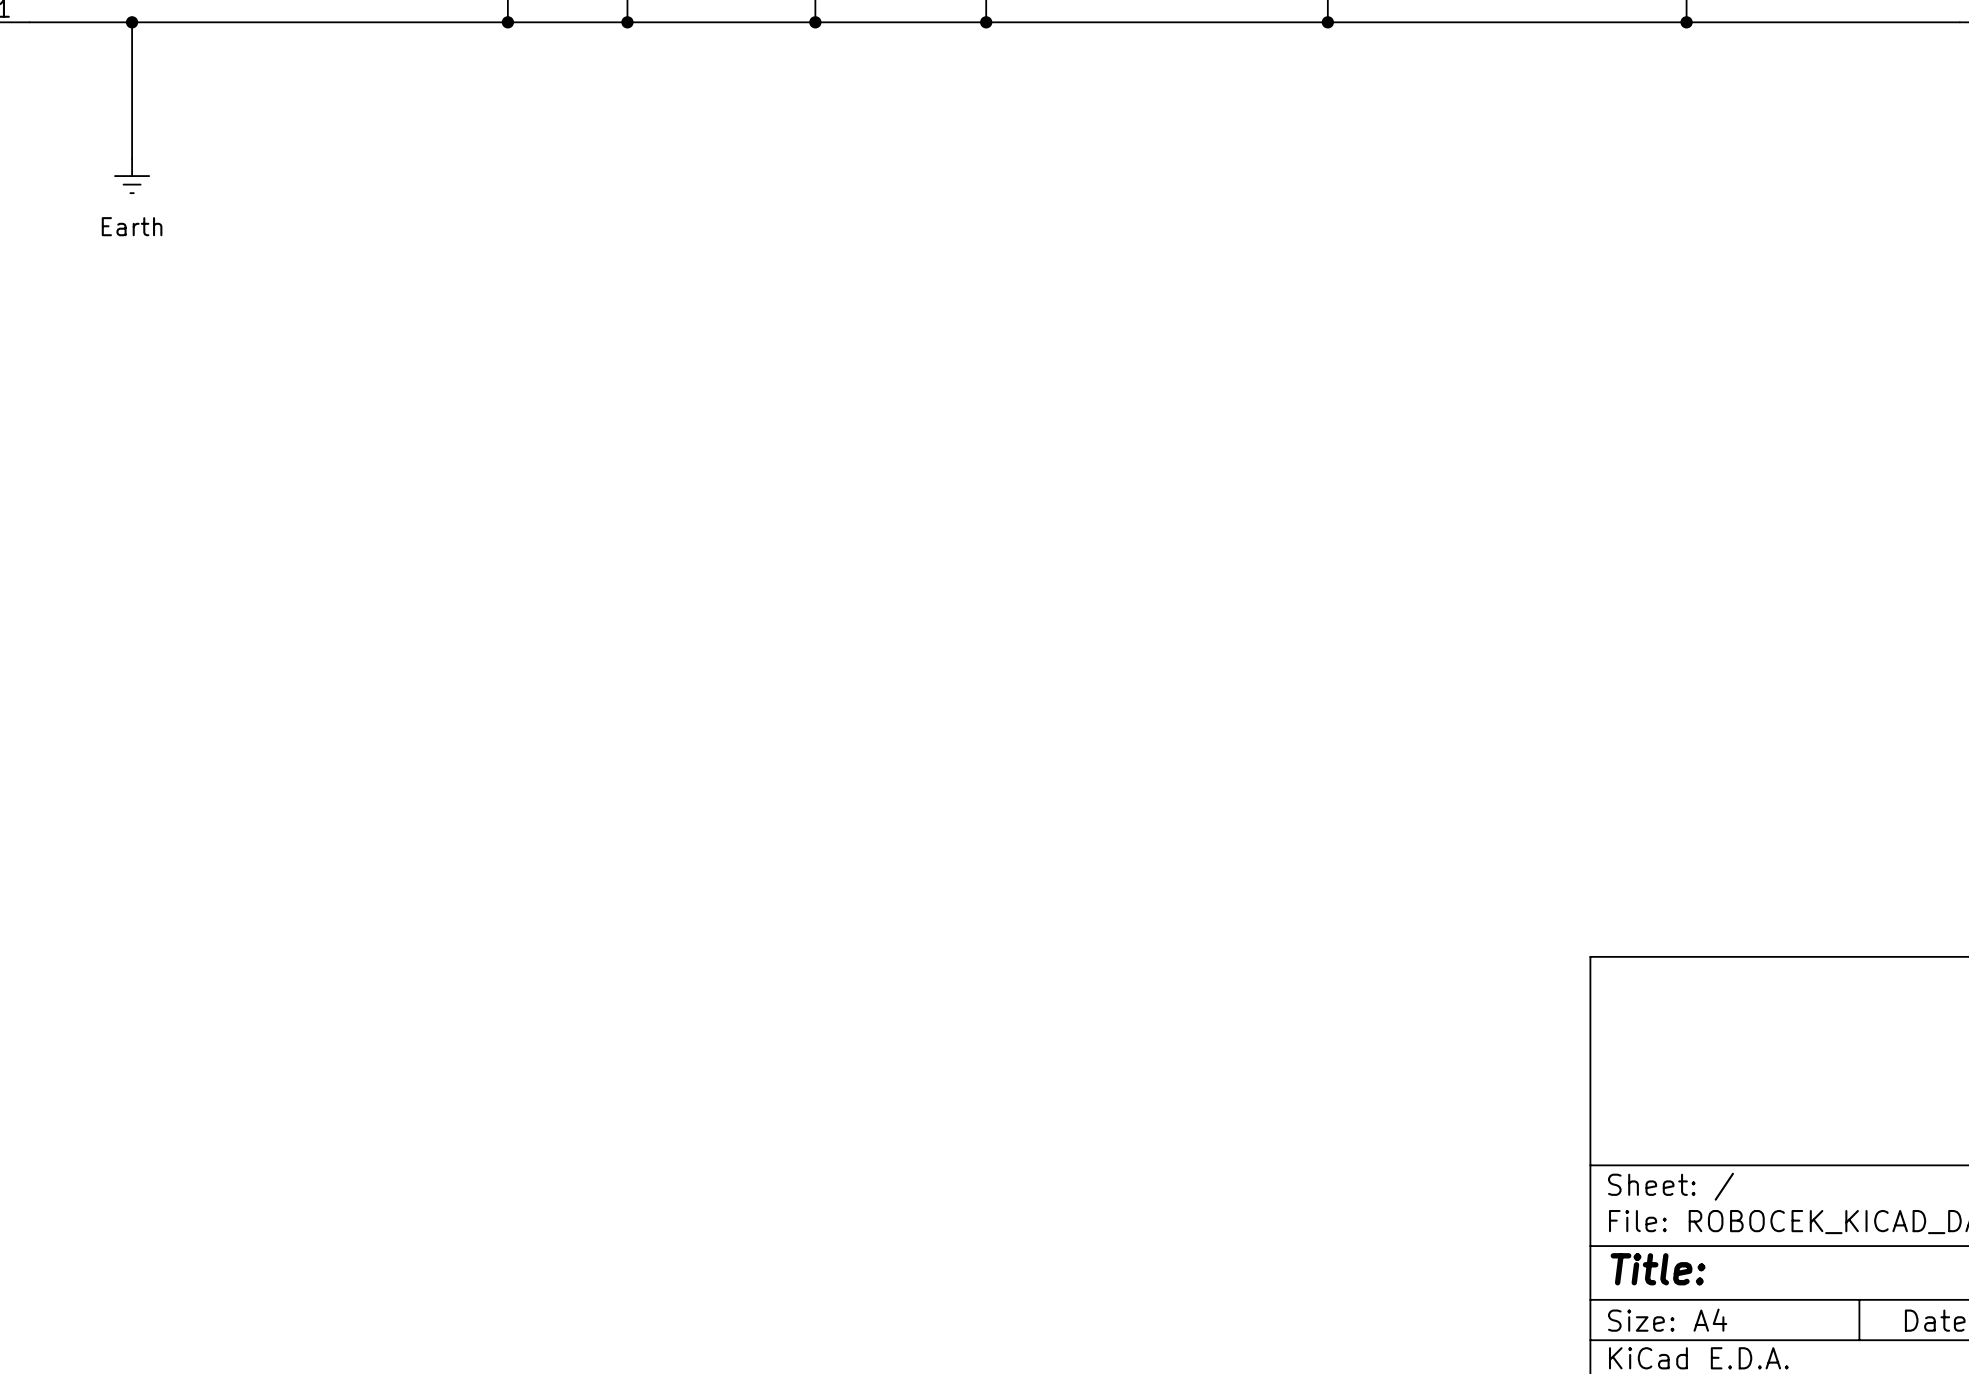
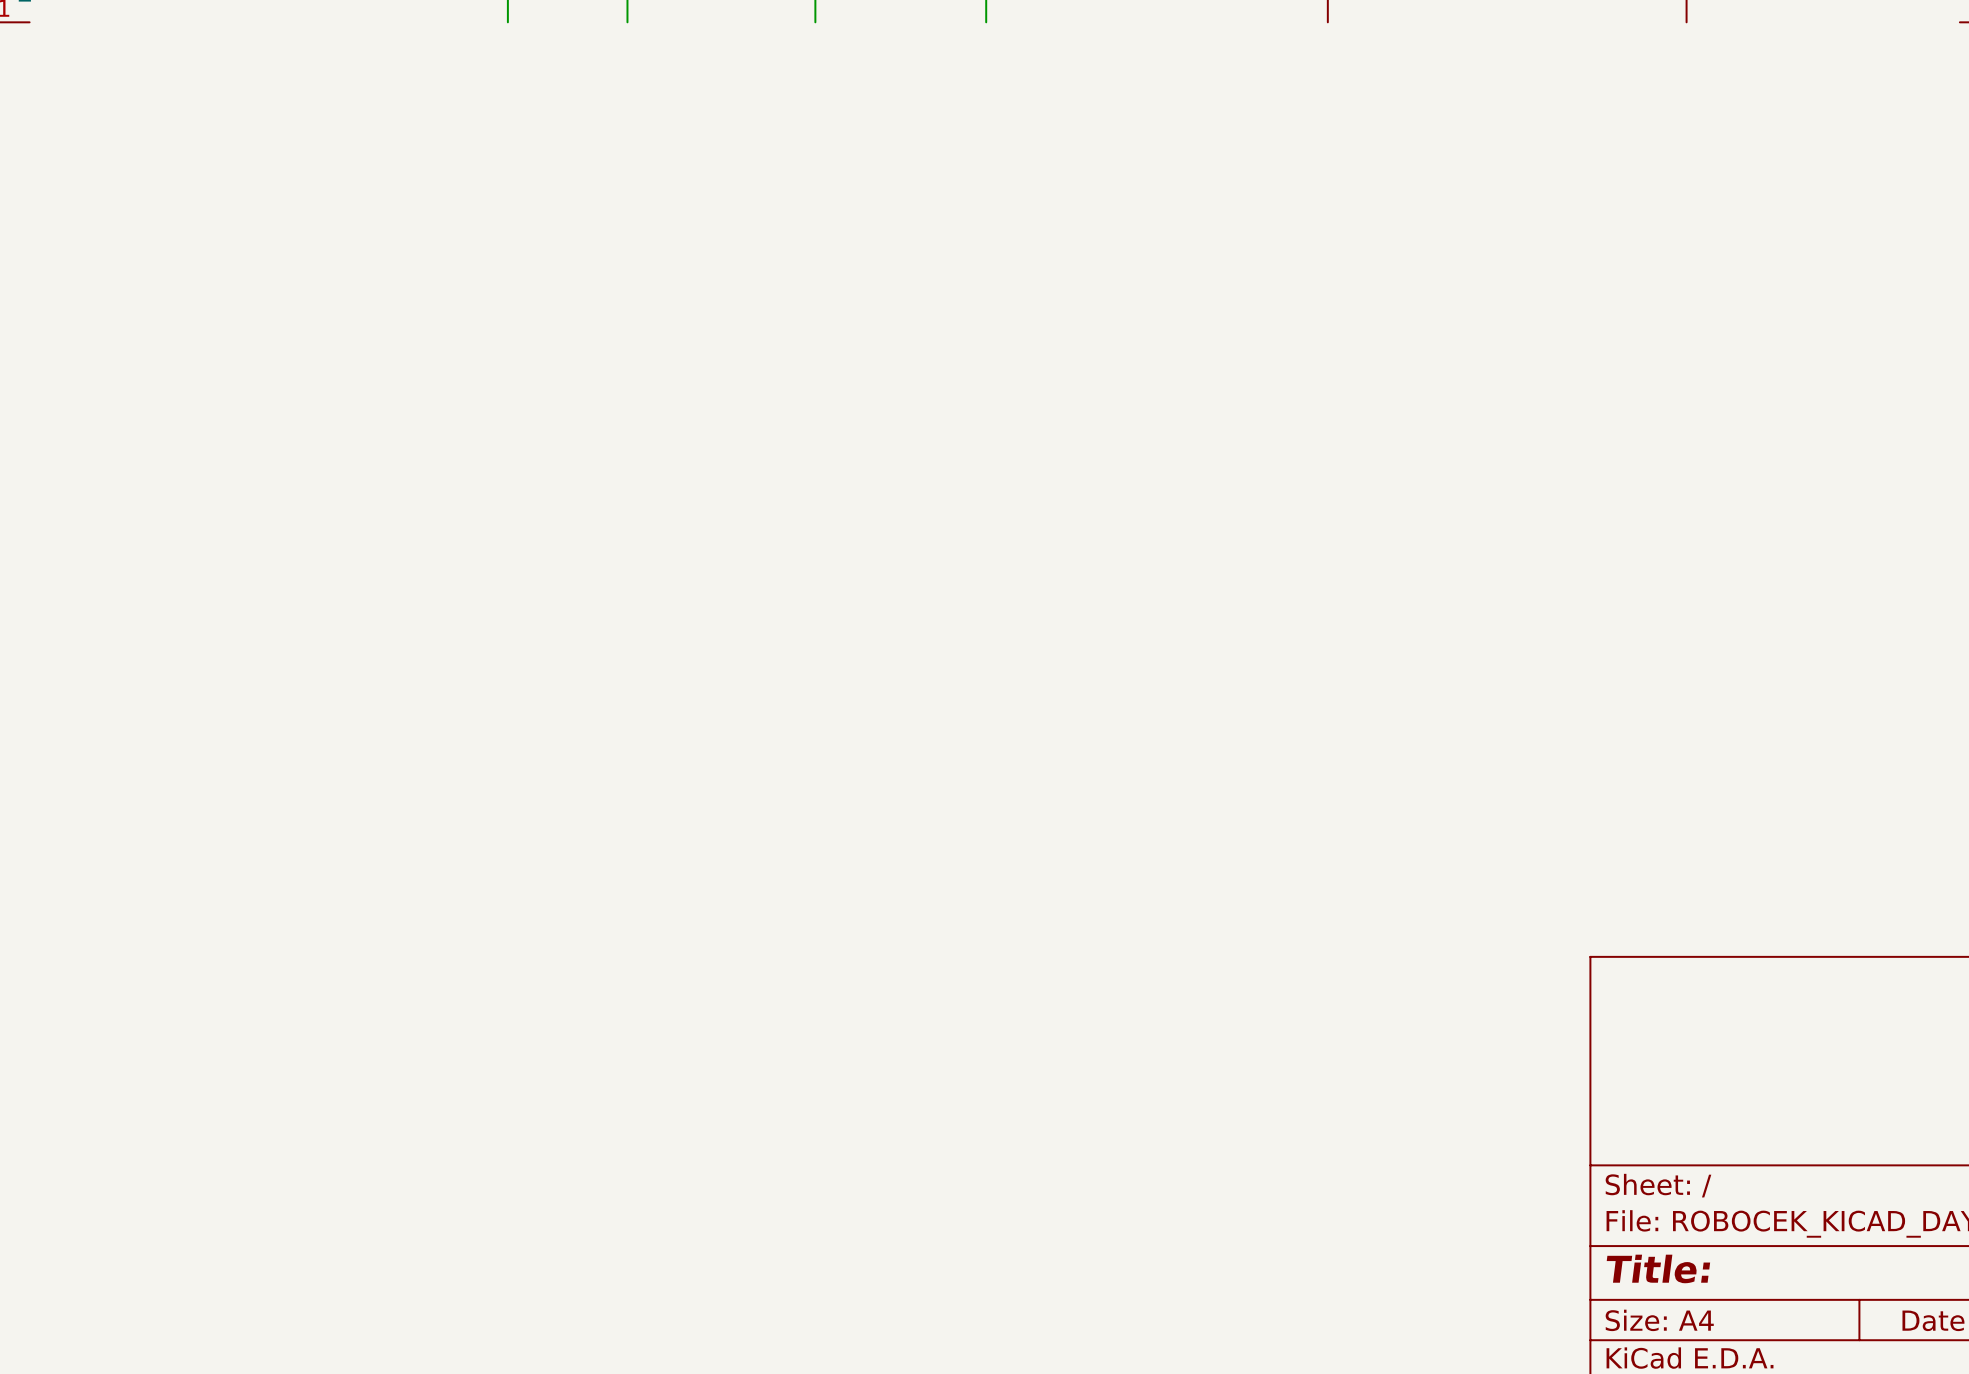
wire: (29, 22) (1959, 22) -> none
wire: (132, 22) (132, 158) -> none
junction: (132, 22) -> none
junction: (507, 22) -> none
junction: (627, 22) -> none
junction: (815, 22) -> none
junction: (986, 22) -> none
junction: (1327, 22) -> none
junction: (1686, 22) -> none
power symbol: Earth (132, 176) -> none

